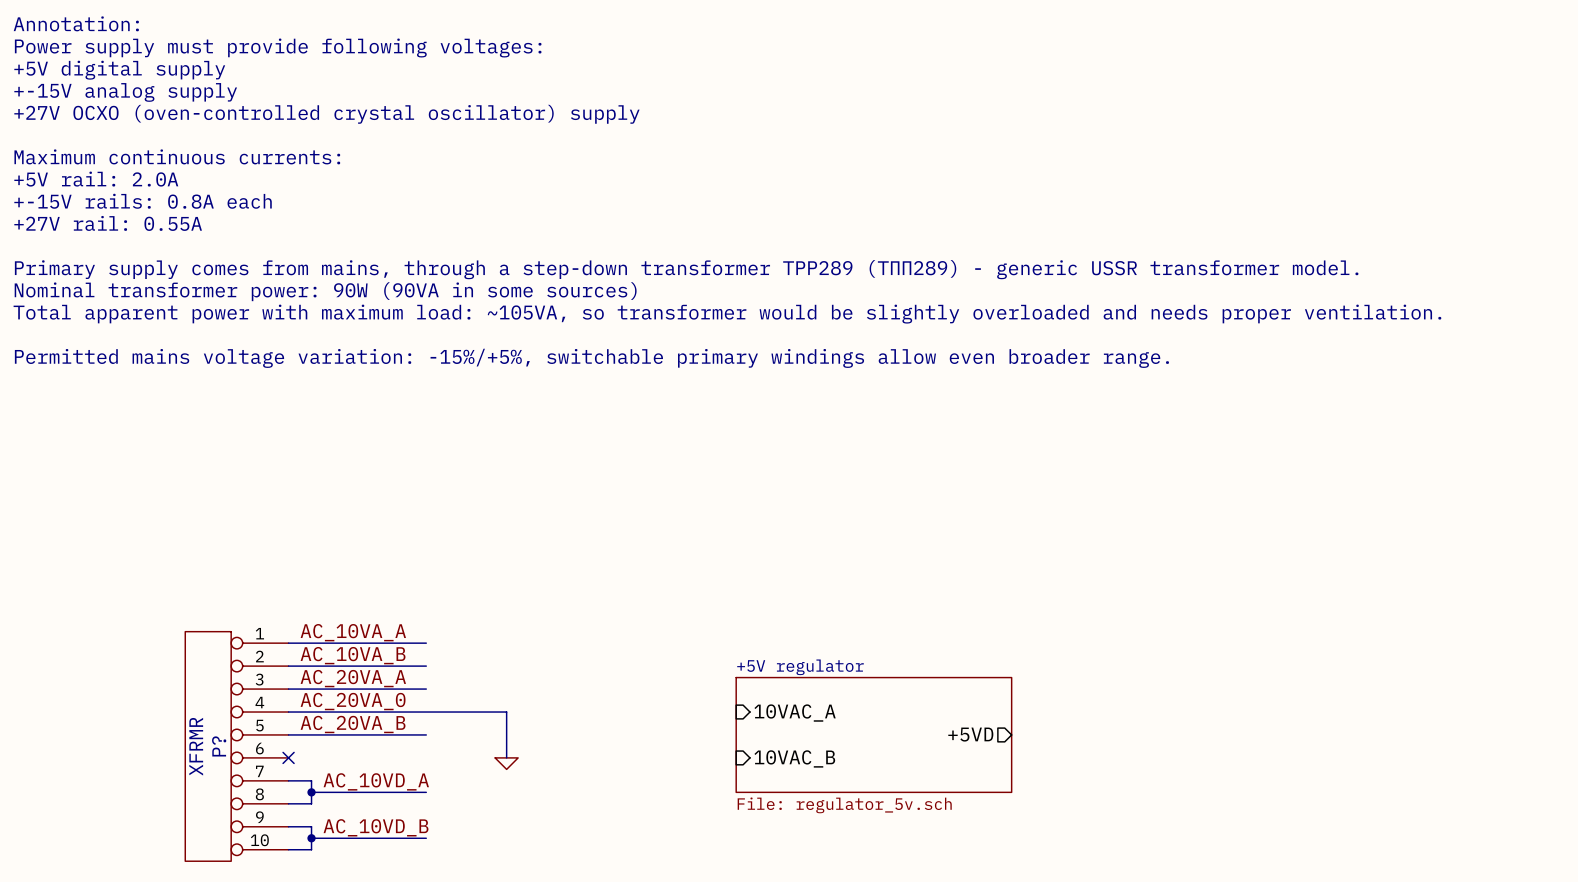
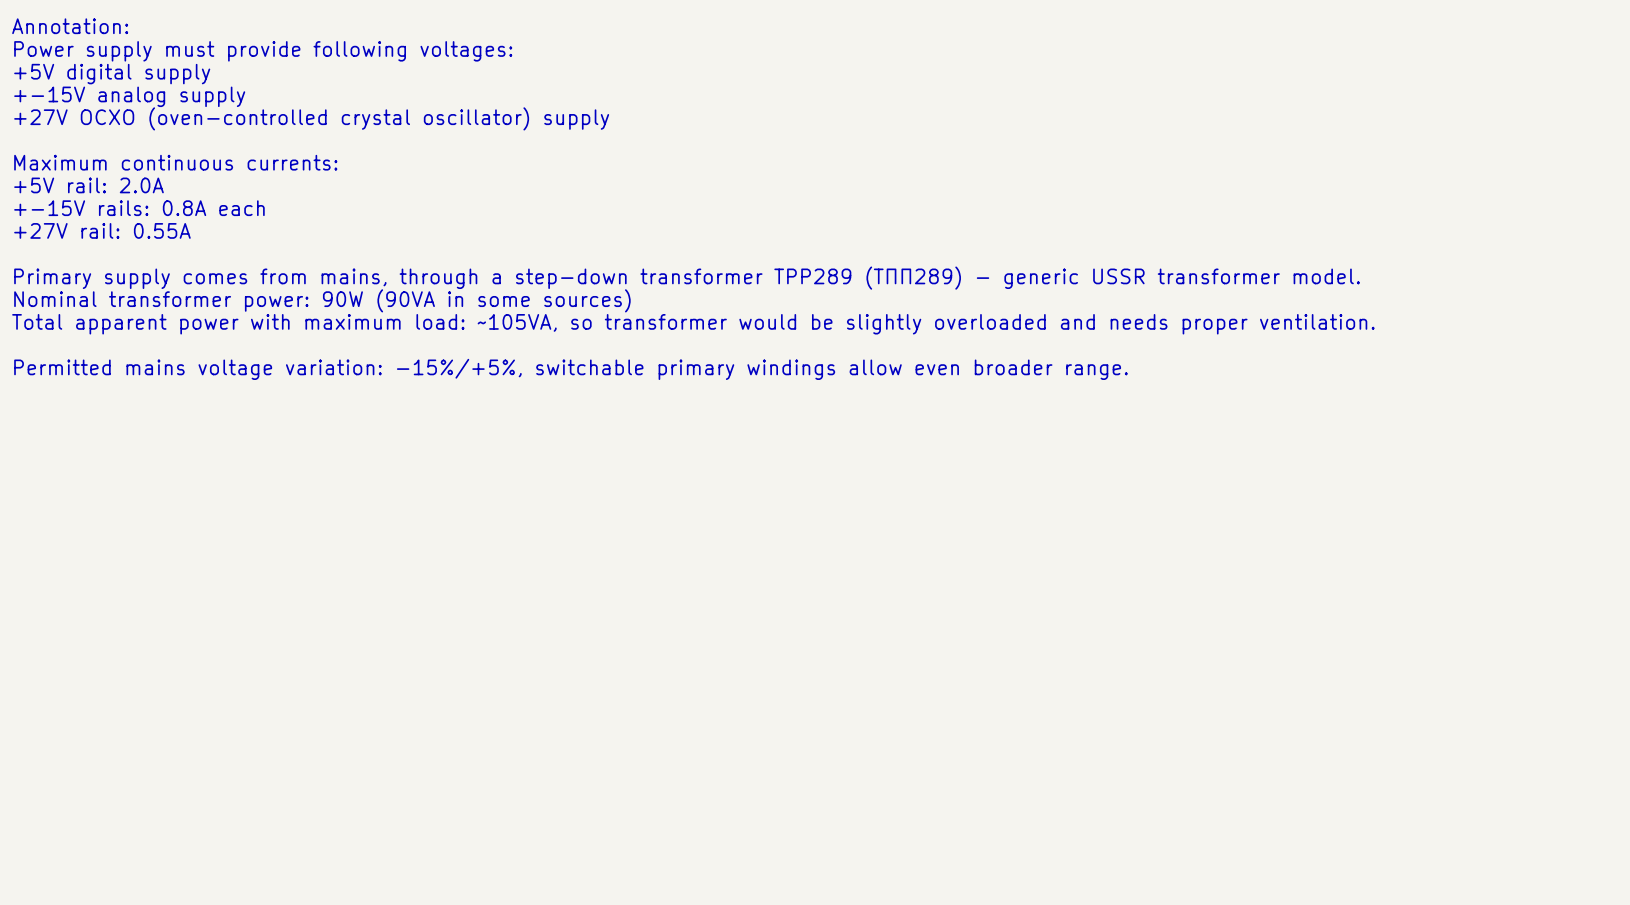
label: AC_10VA_A (353, 632) -> none
wire: (288, 643) (426, 643) -> none
label: AC_10VA_B (353, 655) -> none
wire: (288, 666) (426, 666) -> none
label: AC_20VA_A (353, 678) -> none
wire: (288, 689) (426, 689) -> none
label: AC_20VA_0 (353, 701) -> none
wire: (288, 712) (506, 712) (506, 757) -> none
sheet pin: 10VAC_A (795, 713) -> none
label: AC_20VA_B (353, 724) -> none
wire: (288, 734) (426, 734) -> none
sheet +5V regulator: File: regulator_5v.sch (873, 734) -> none
sheet pin: +5VD (970, 734) -> none
P?: XFRMR (236, 746) -> none
no-connect mark: (288, 757) -> none
sheet pin: 10VAC_B (794, 758) -> none
power symbol: (506, 763) -> none
wire: (288, 780) (311, 780) (311, 803) (288, 803) -> none
label: AC_10VD_A (376, 781) -> none
wire: (311, 792) (426, 792) -> none
junction: (311, 792) -> none
wire: (288, 826) (311, 826) (311, 849) (288, 849) -> none
label: AC_10VD_B (376, 827) -> none
wire: (311, 838) (426, 838) -> none
junction: (311, 838) -> none

